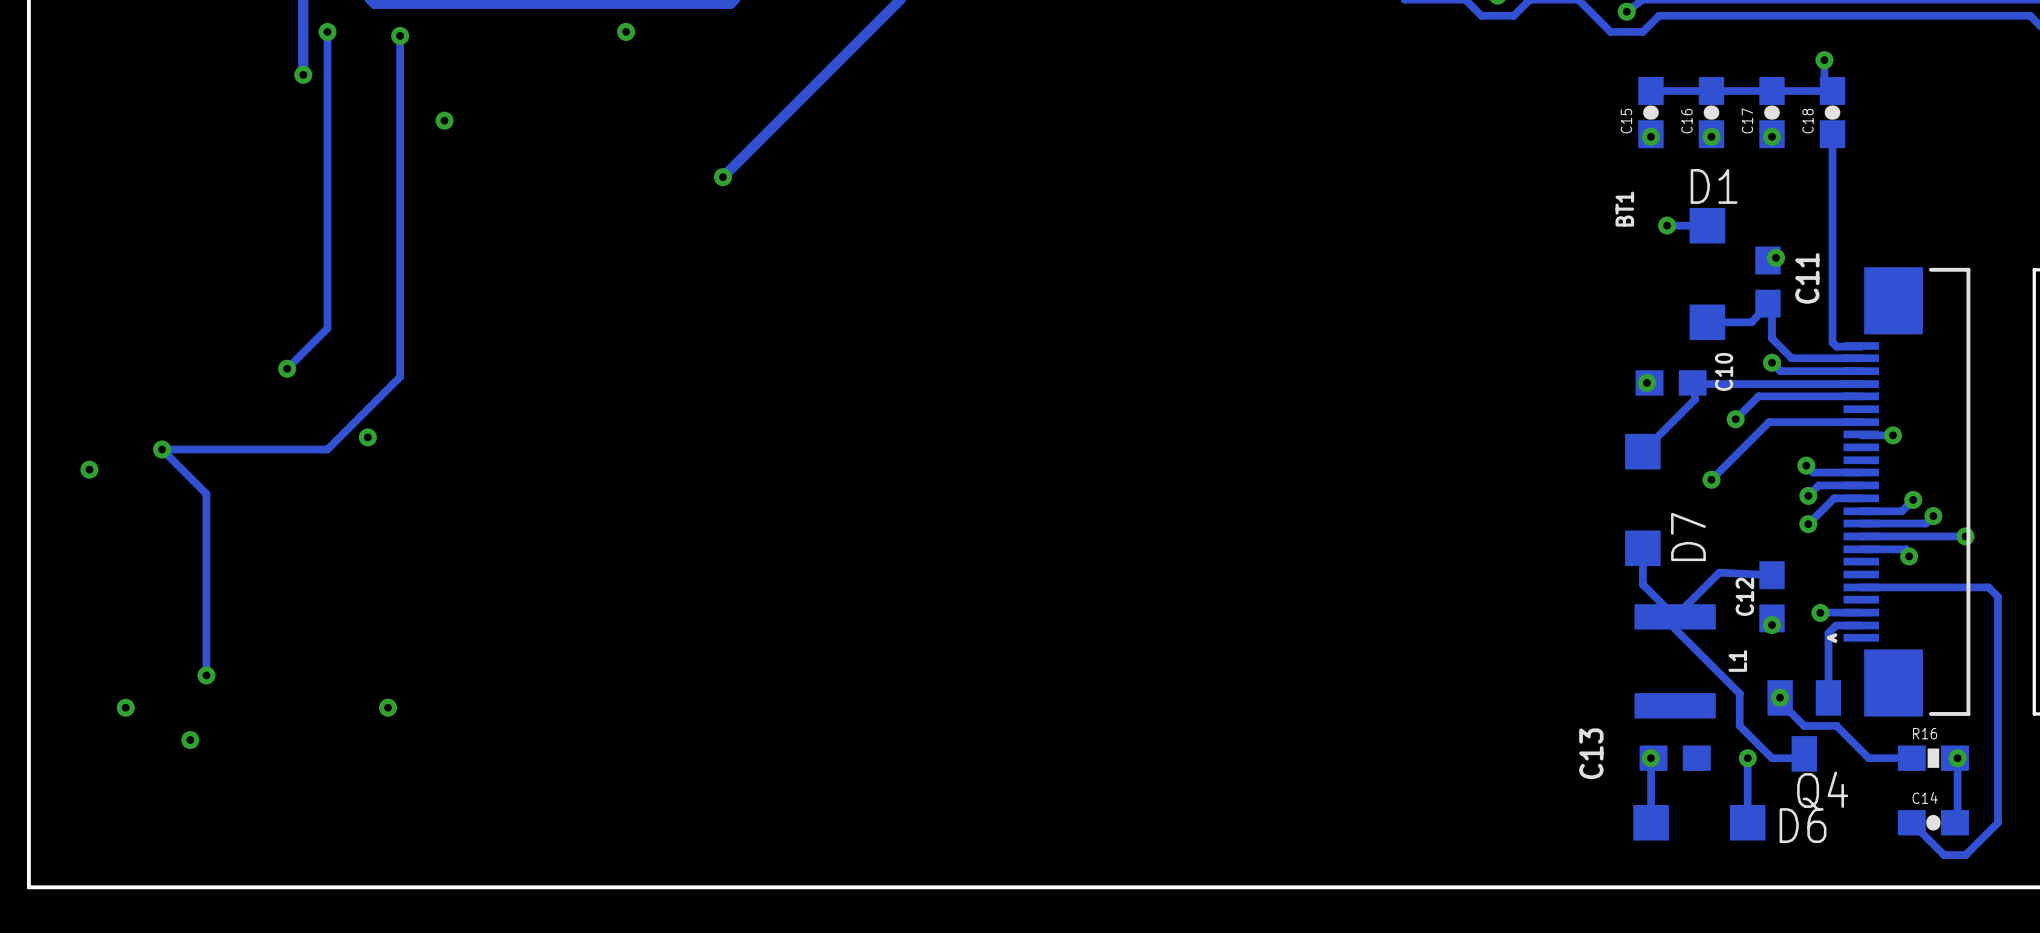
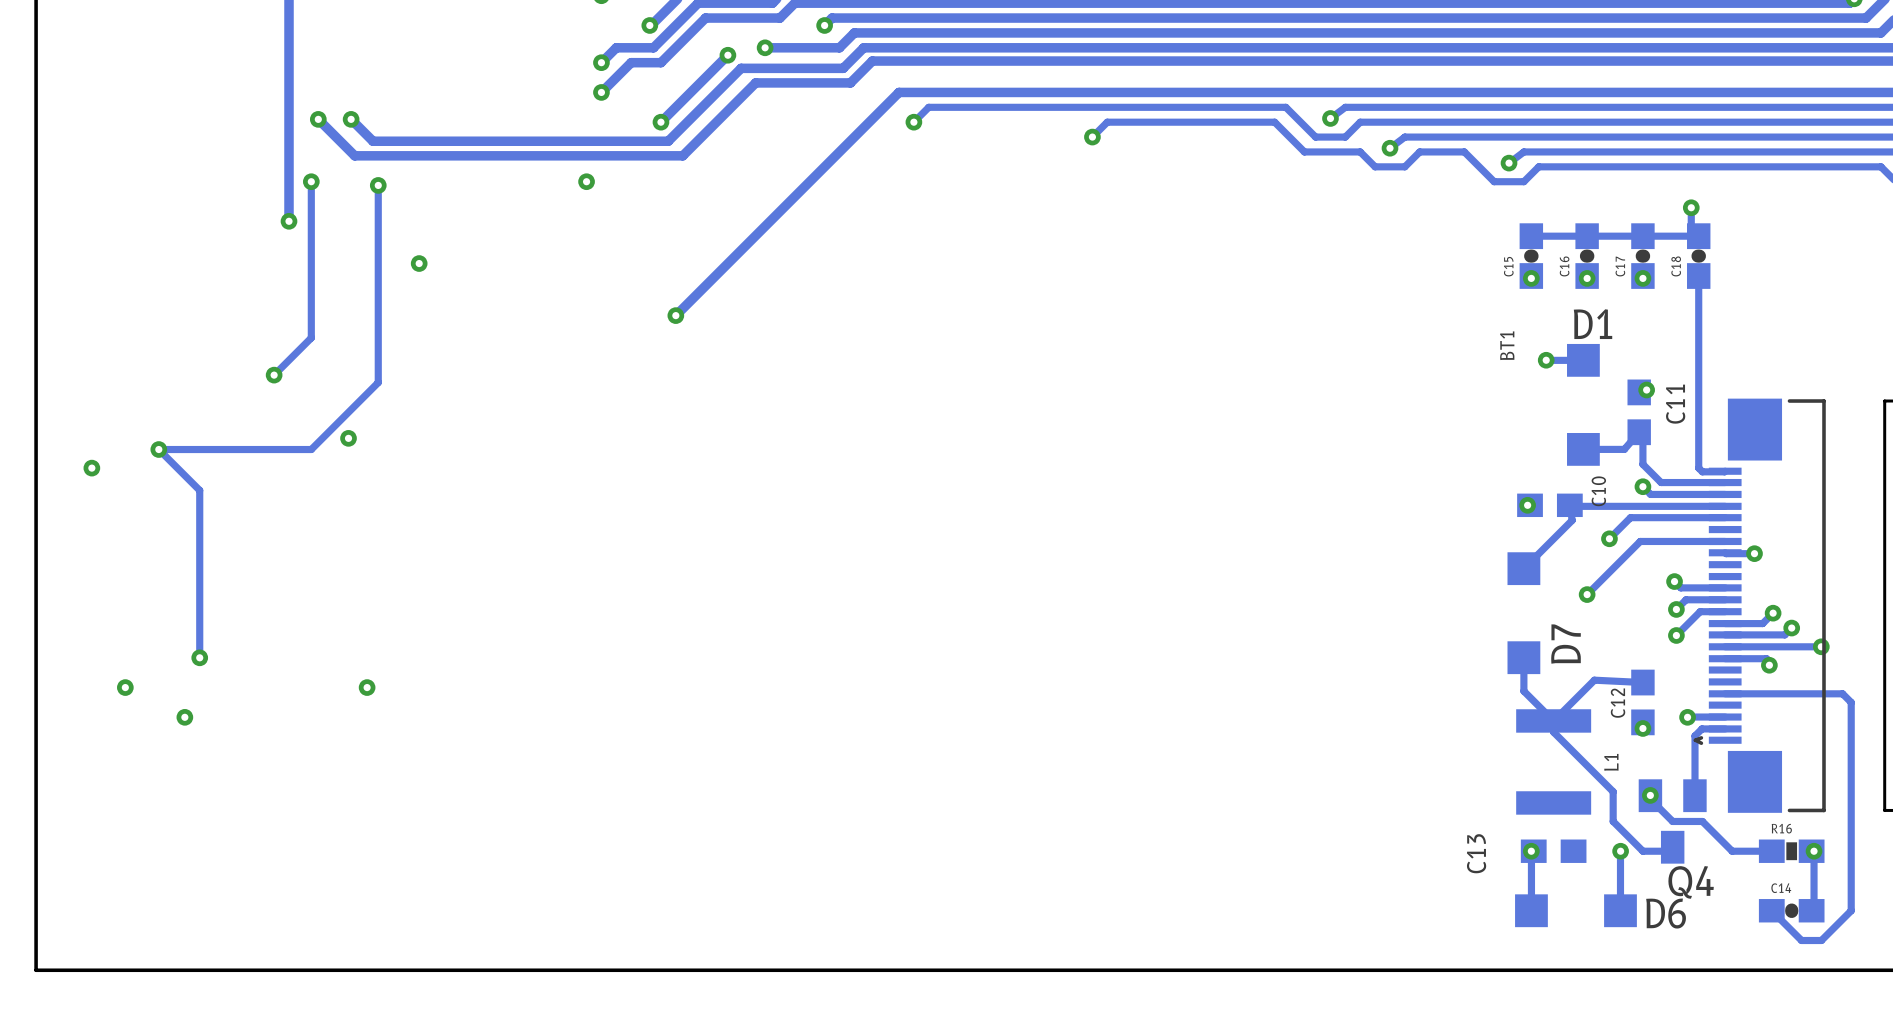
track: (327, 201) (327, 328) (287, 368) -> (311, 337) (274, 375)
via: none -> (274, 375)
track: (400, 249) (400, 376) (327, 449) (162, 449) (206, 493) -> (378, 382) (311, 449) (158, 449) (199, 490) (199, 607)
via: none -> (348, 438)
via: none -> (158, 449)
via: none -> (91, 468)
via: (287, 368) -> none
via: (367, 437) -> none
via: (162, 449) -> none
via: (89, 469) -> none
track: (206, 548) (206, 675) -> none
via: none -> (199, 657)
via: none -> (125, 687)
via: none -> (367, 687)
via: none -> (184, 717)
via: (206, 675) -> none
via: (125, 707) -> none
via: (388, 707) -> none
via: (190, 740) -> none

